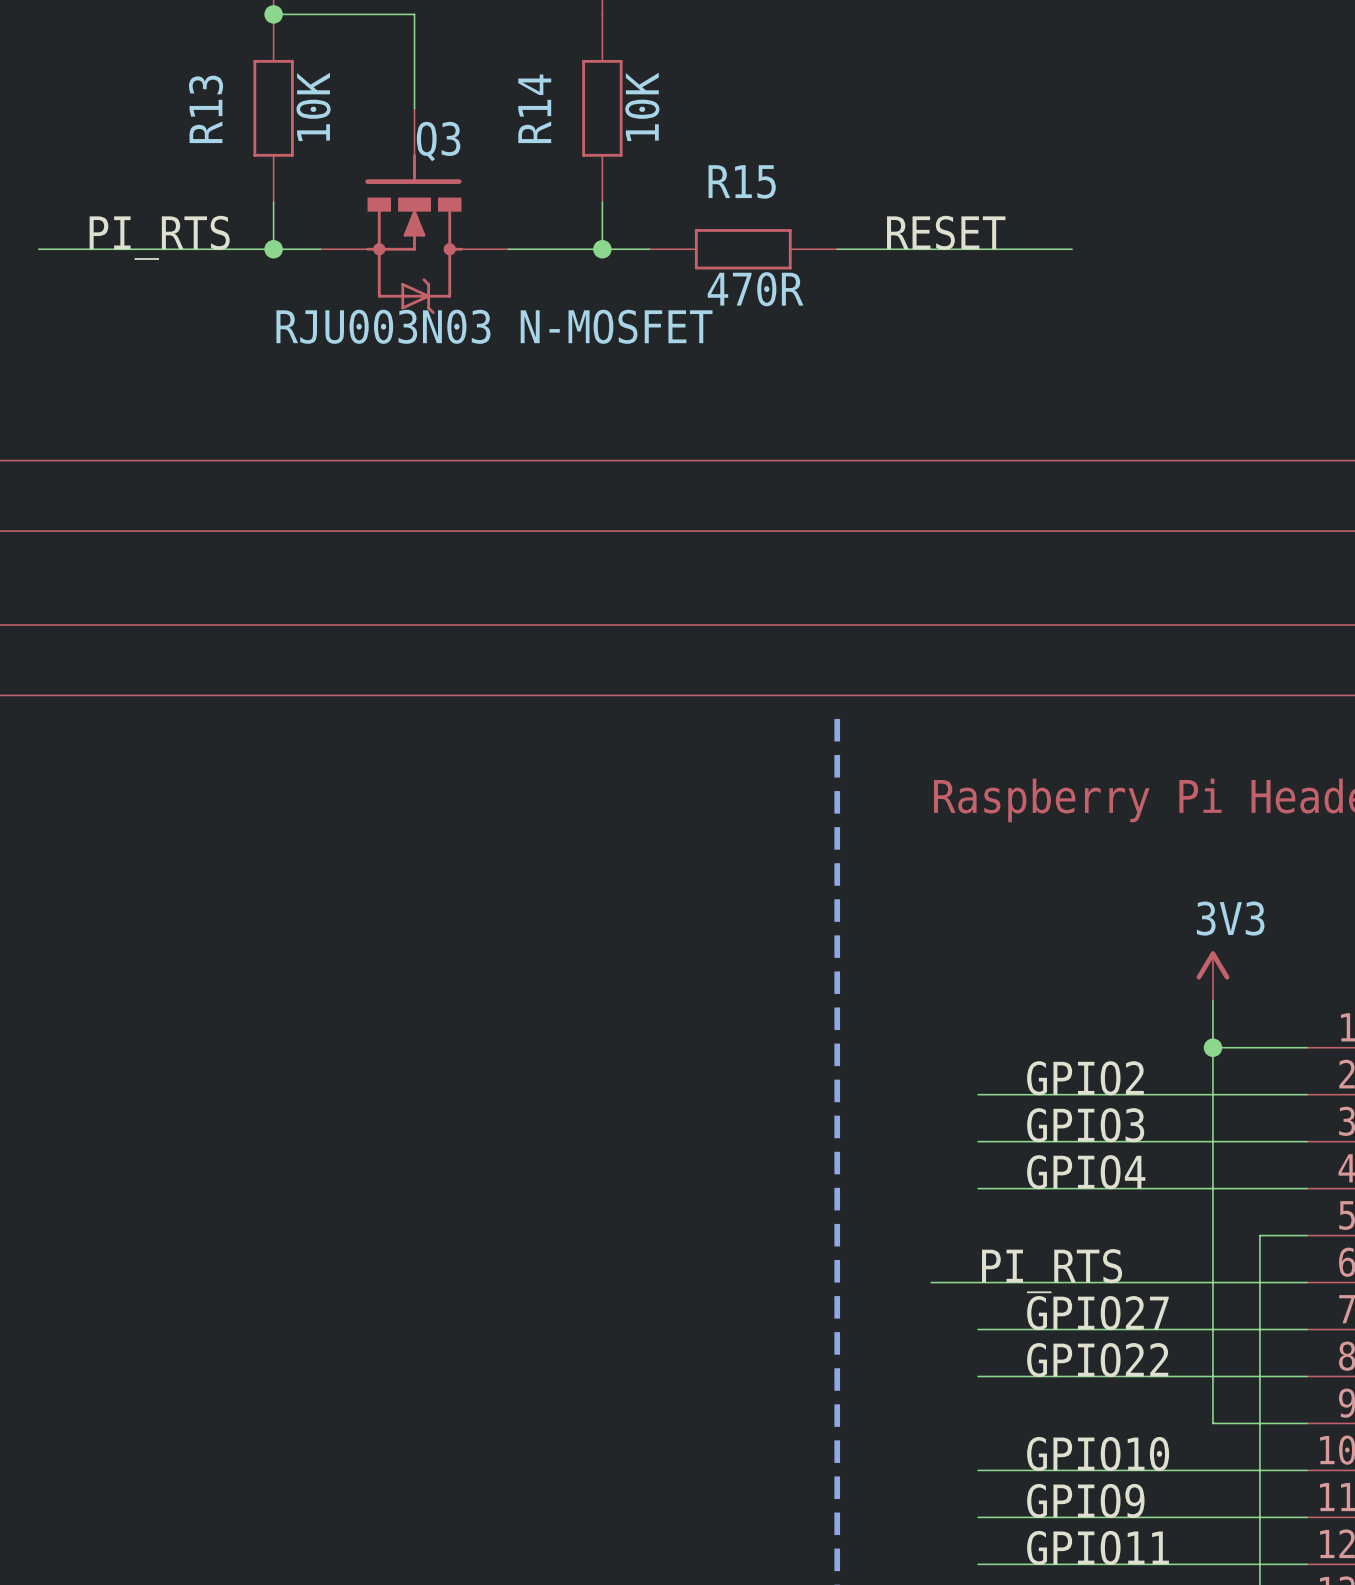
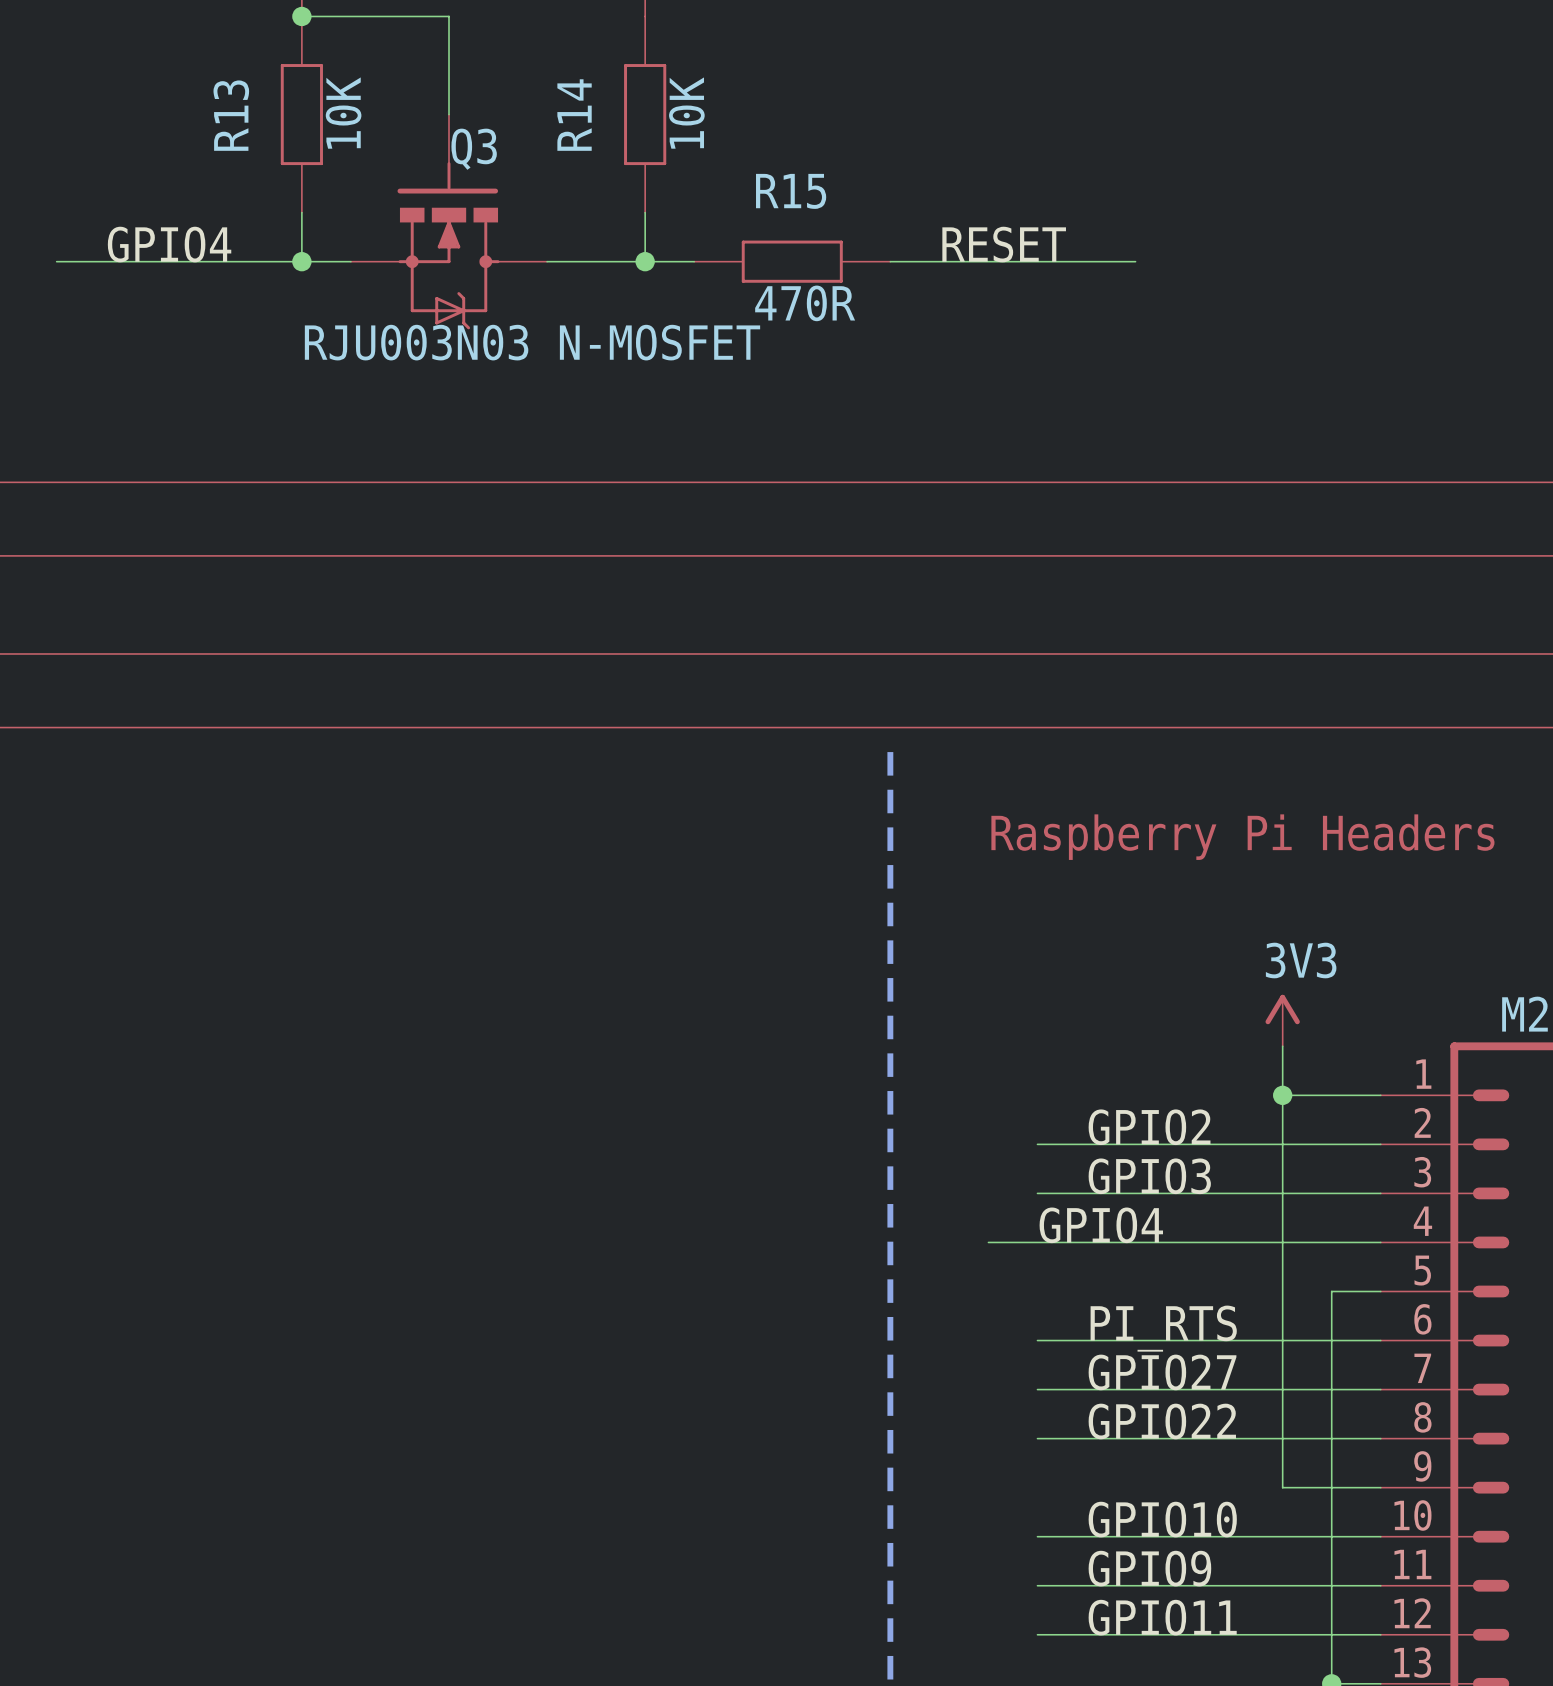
label: PI_RTS (159, 237) -> GPIO4 (169, 244)
label position: GPIO4 (1086, 1172) -> GPIO4 (1101, 1225)
label position: PI_RTS (1052, 1271) -> PI_RTS (1163, 1328)
wire: (931, 1282) (978, 1282) -> (988, 1242) (1037, 1242)

